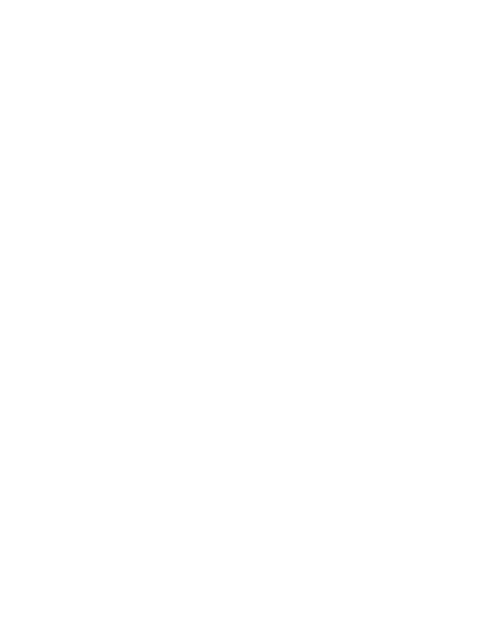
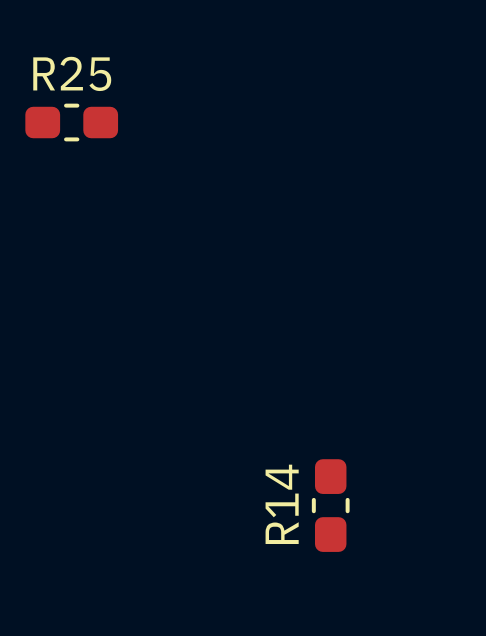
R25: none -> (71, 122)
R14: none -> (330, 505)

